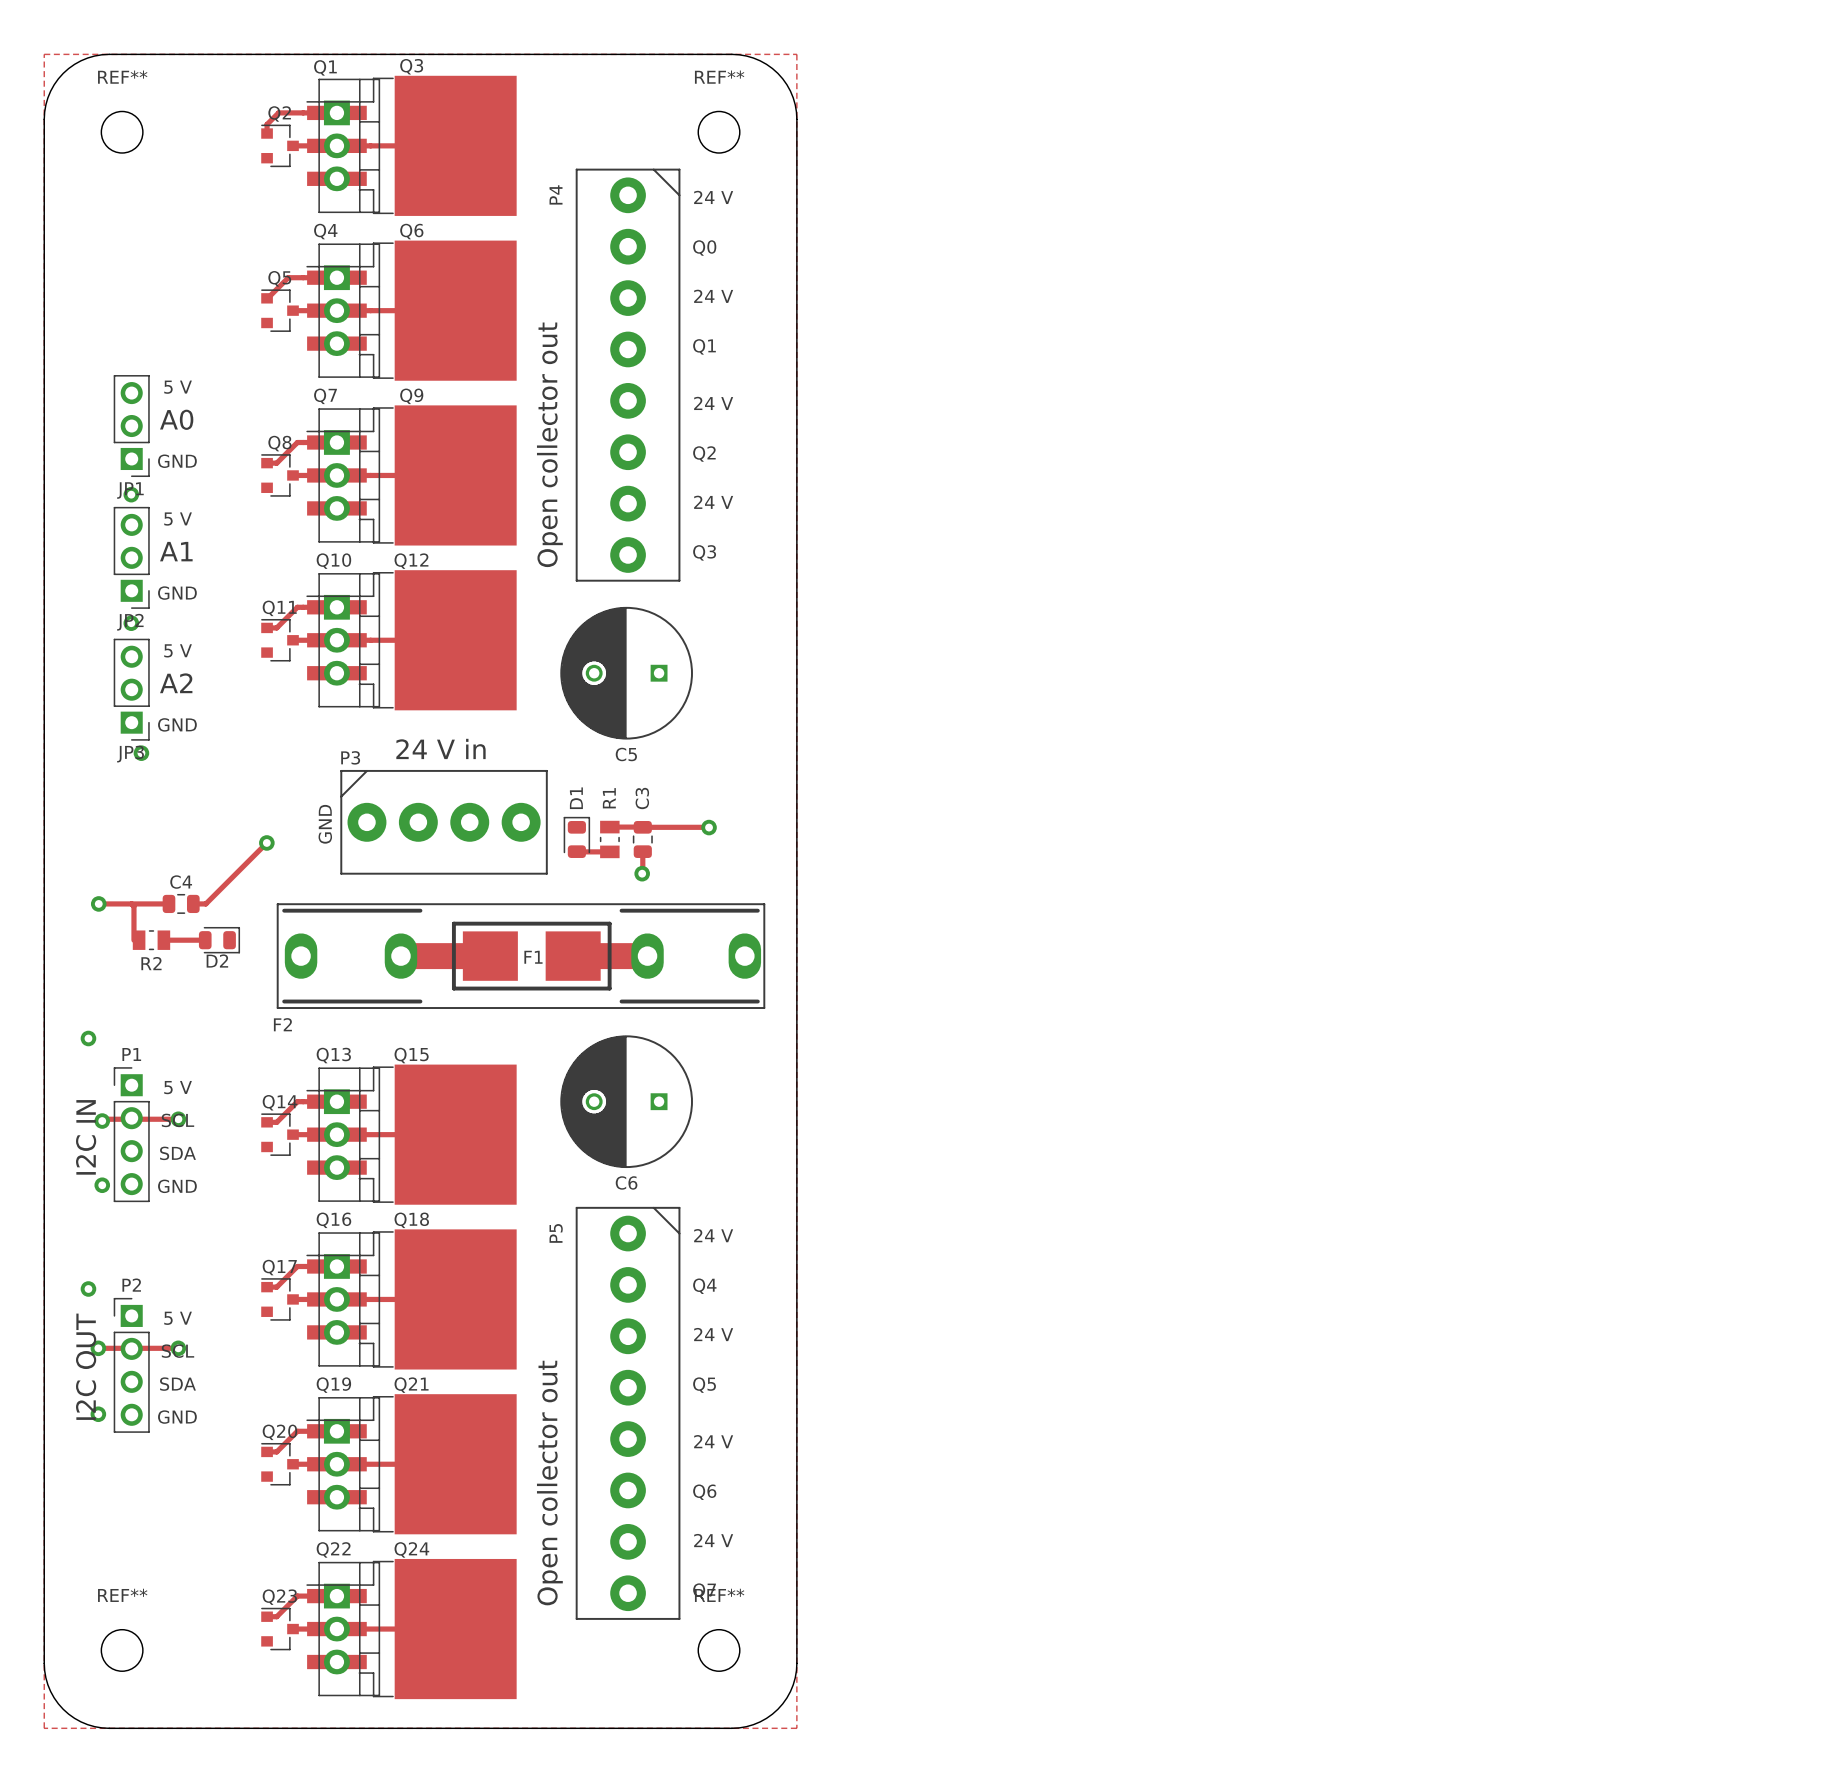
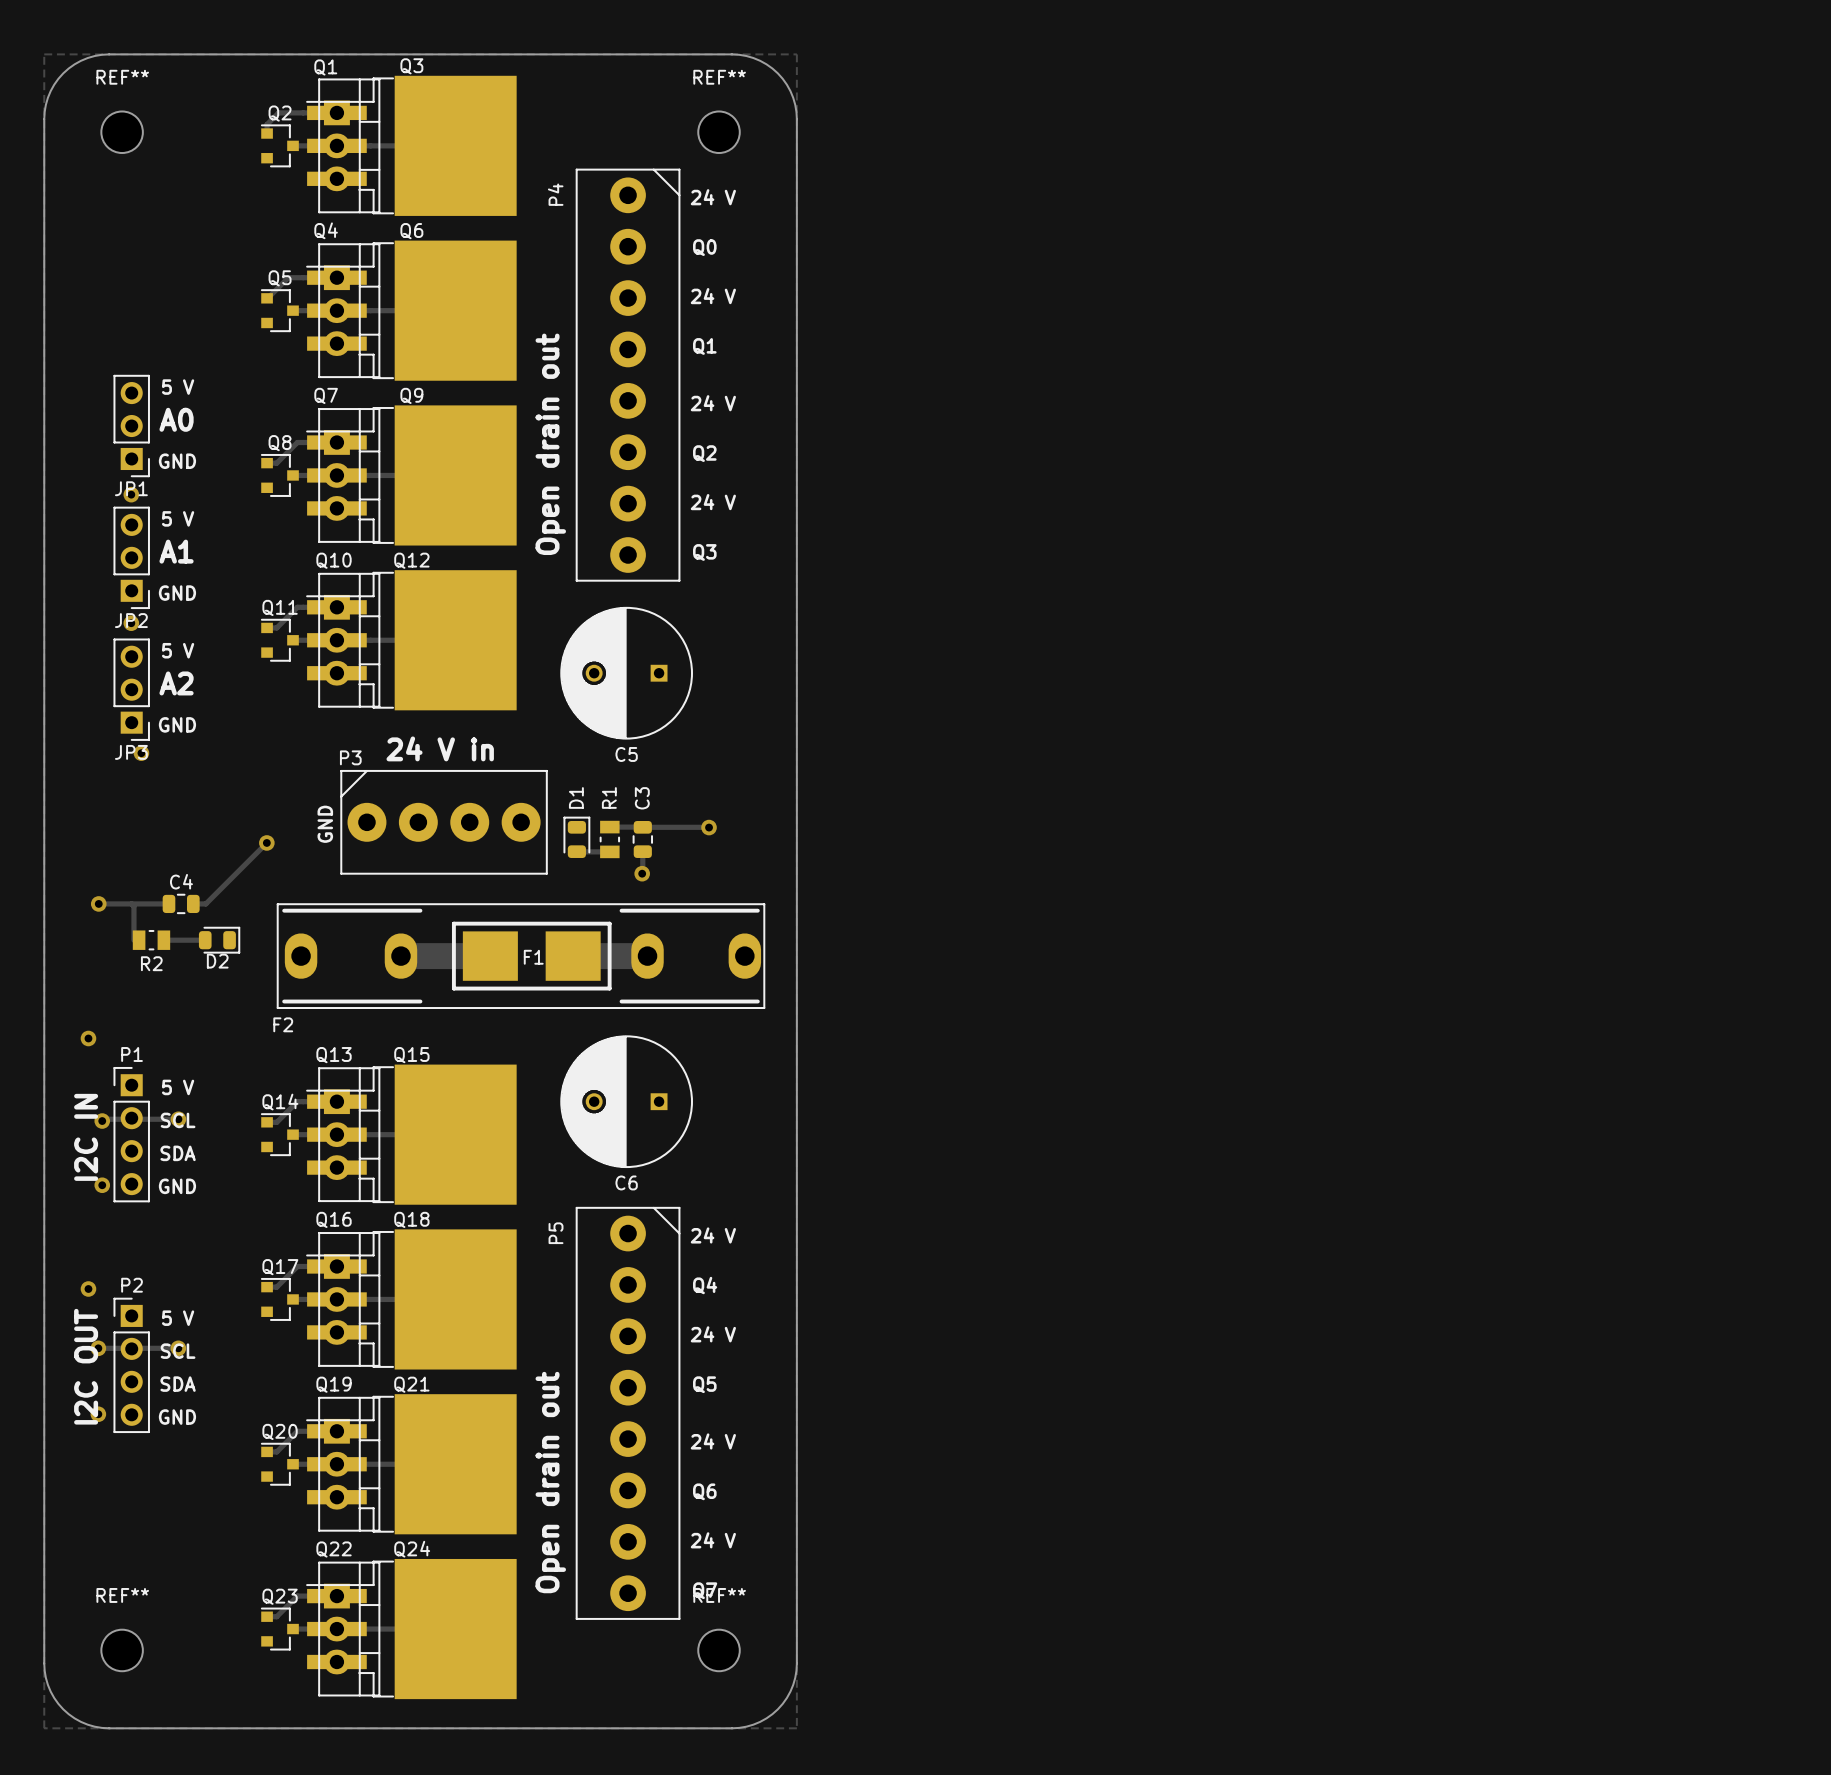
text: Open collector out (549, 444) -> Open drain out (550, 444)
text: Open collector out (549, 1483) -> Open drain out (550, 1482)

